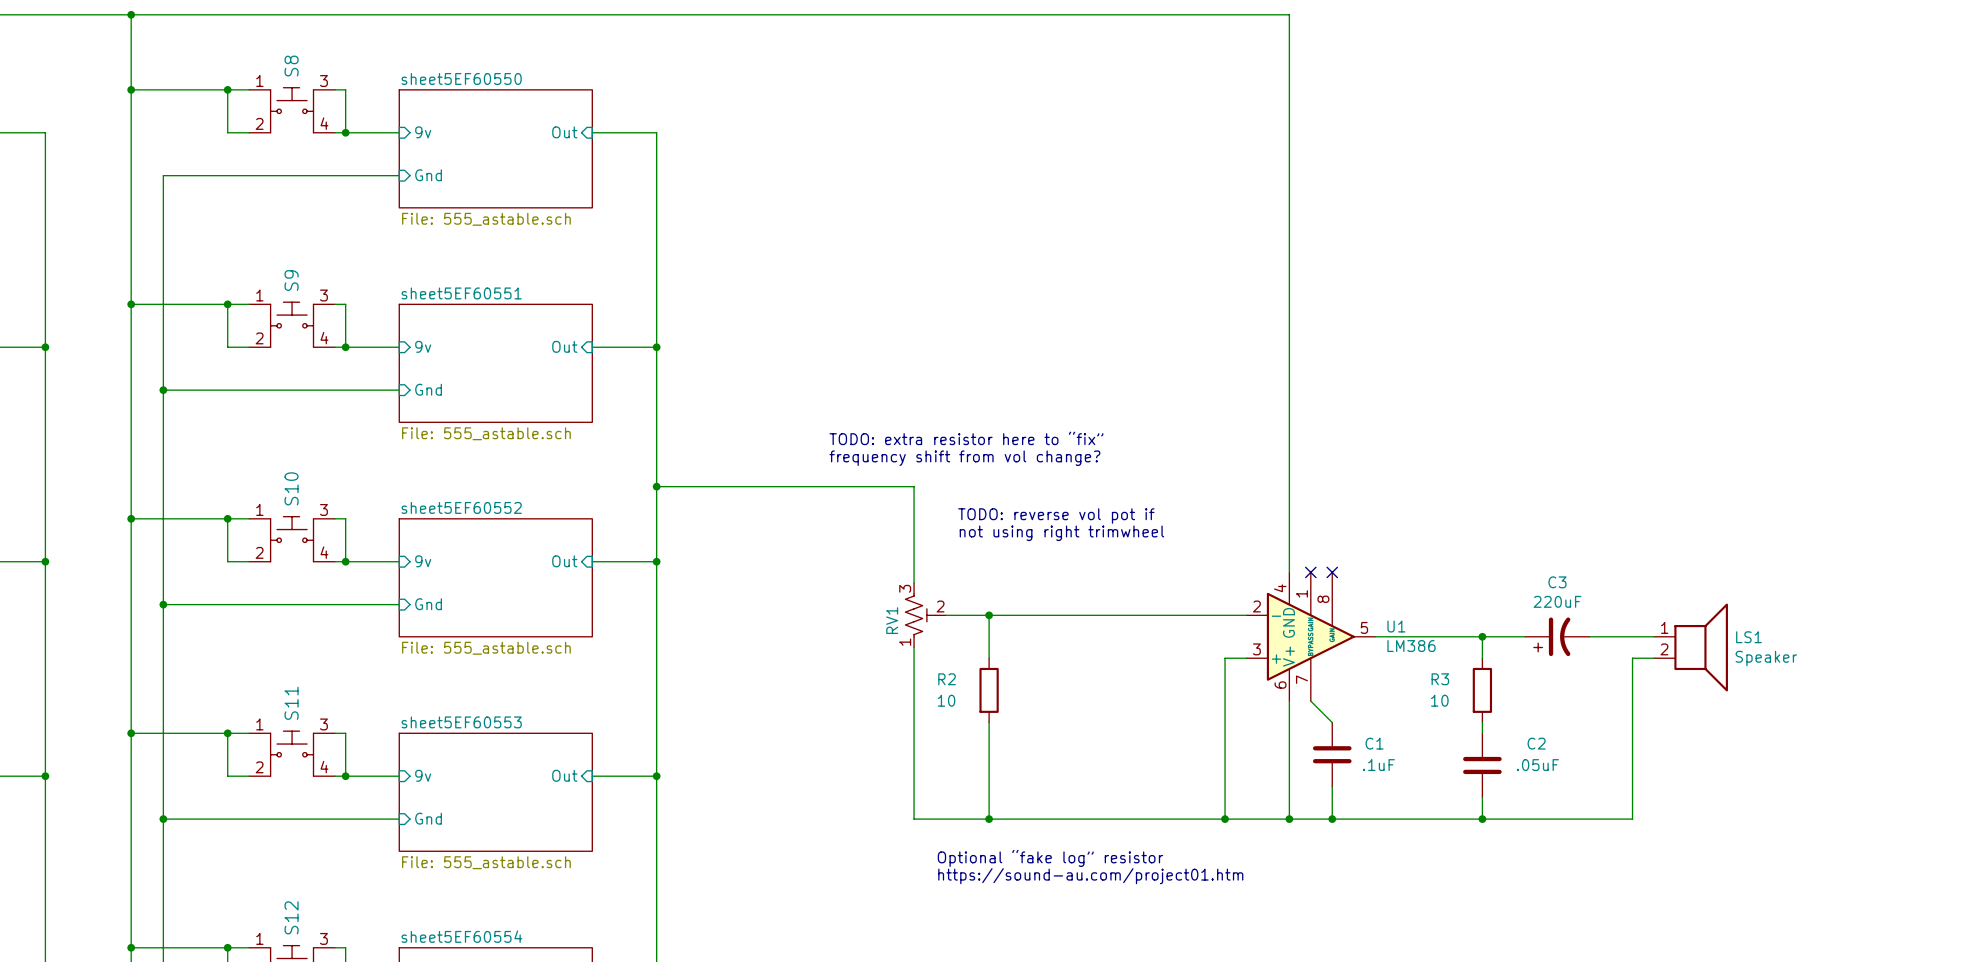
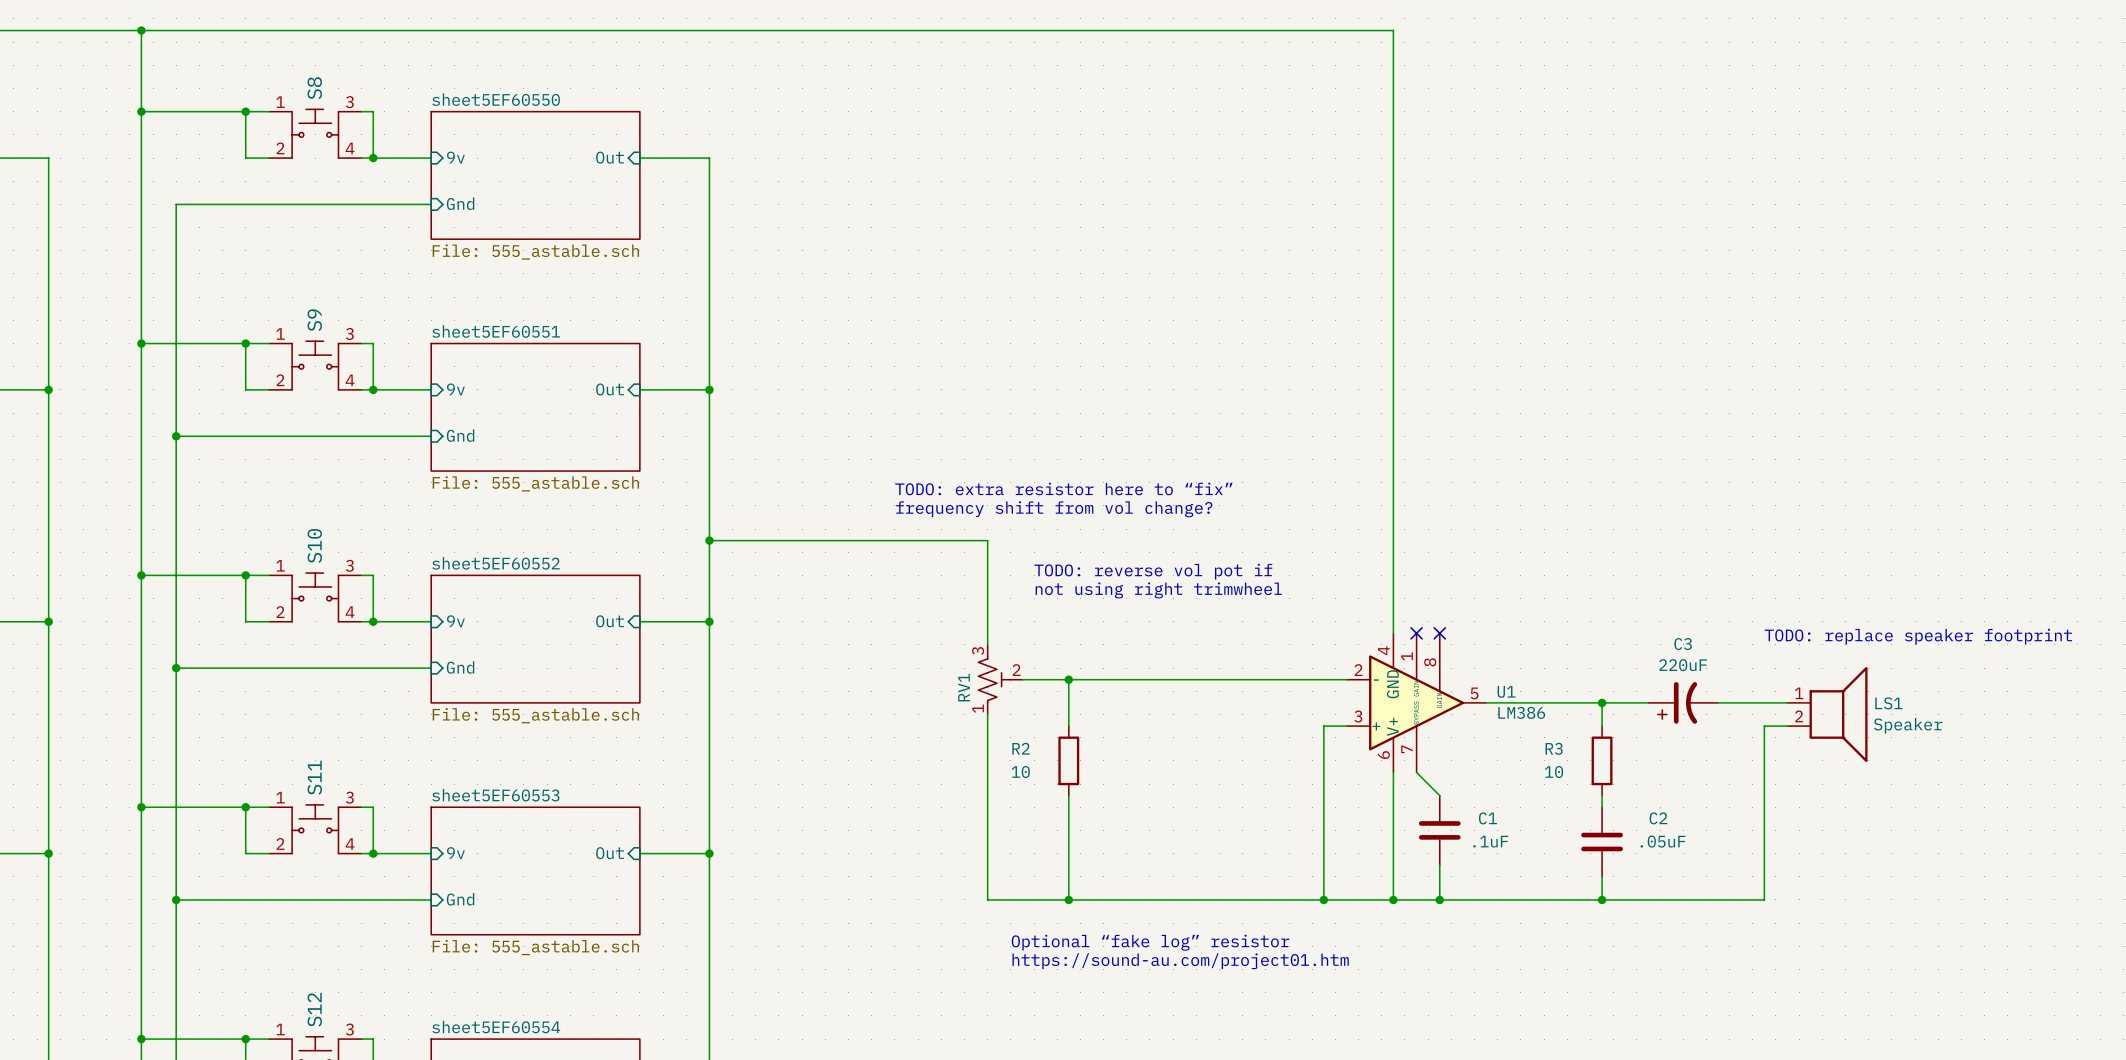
text: none -> TODO: replace speaker footprint (1918, 636)

